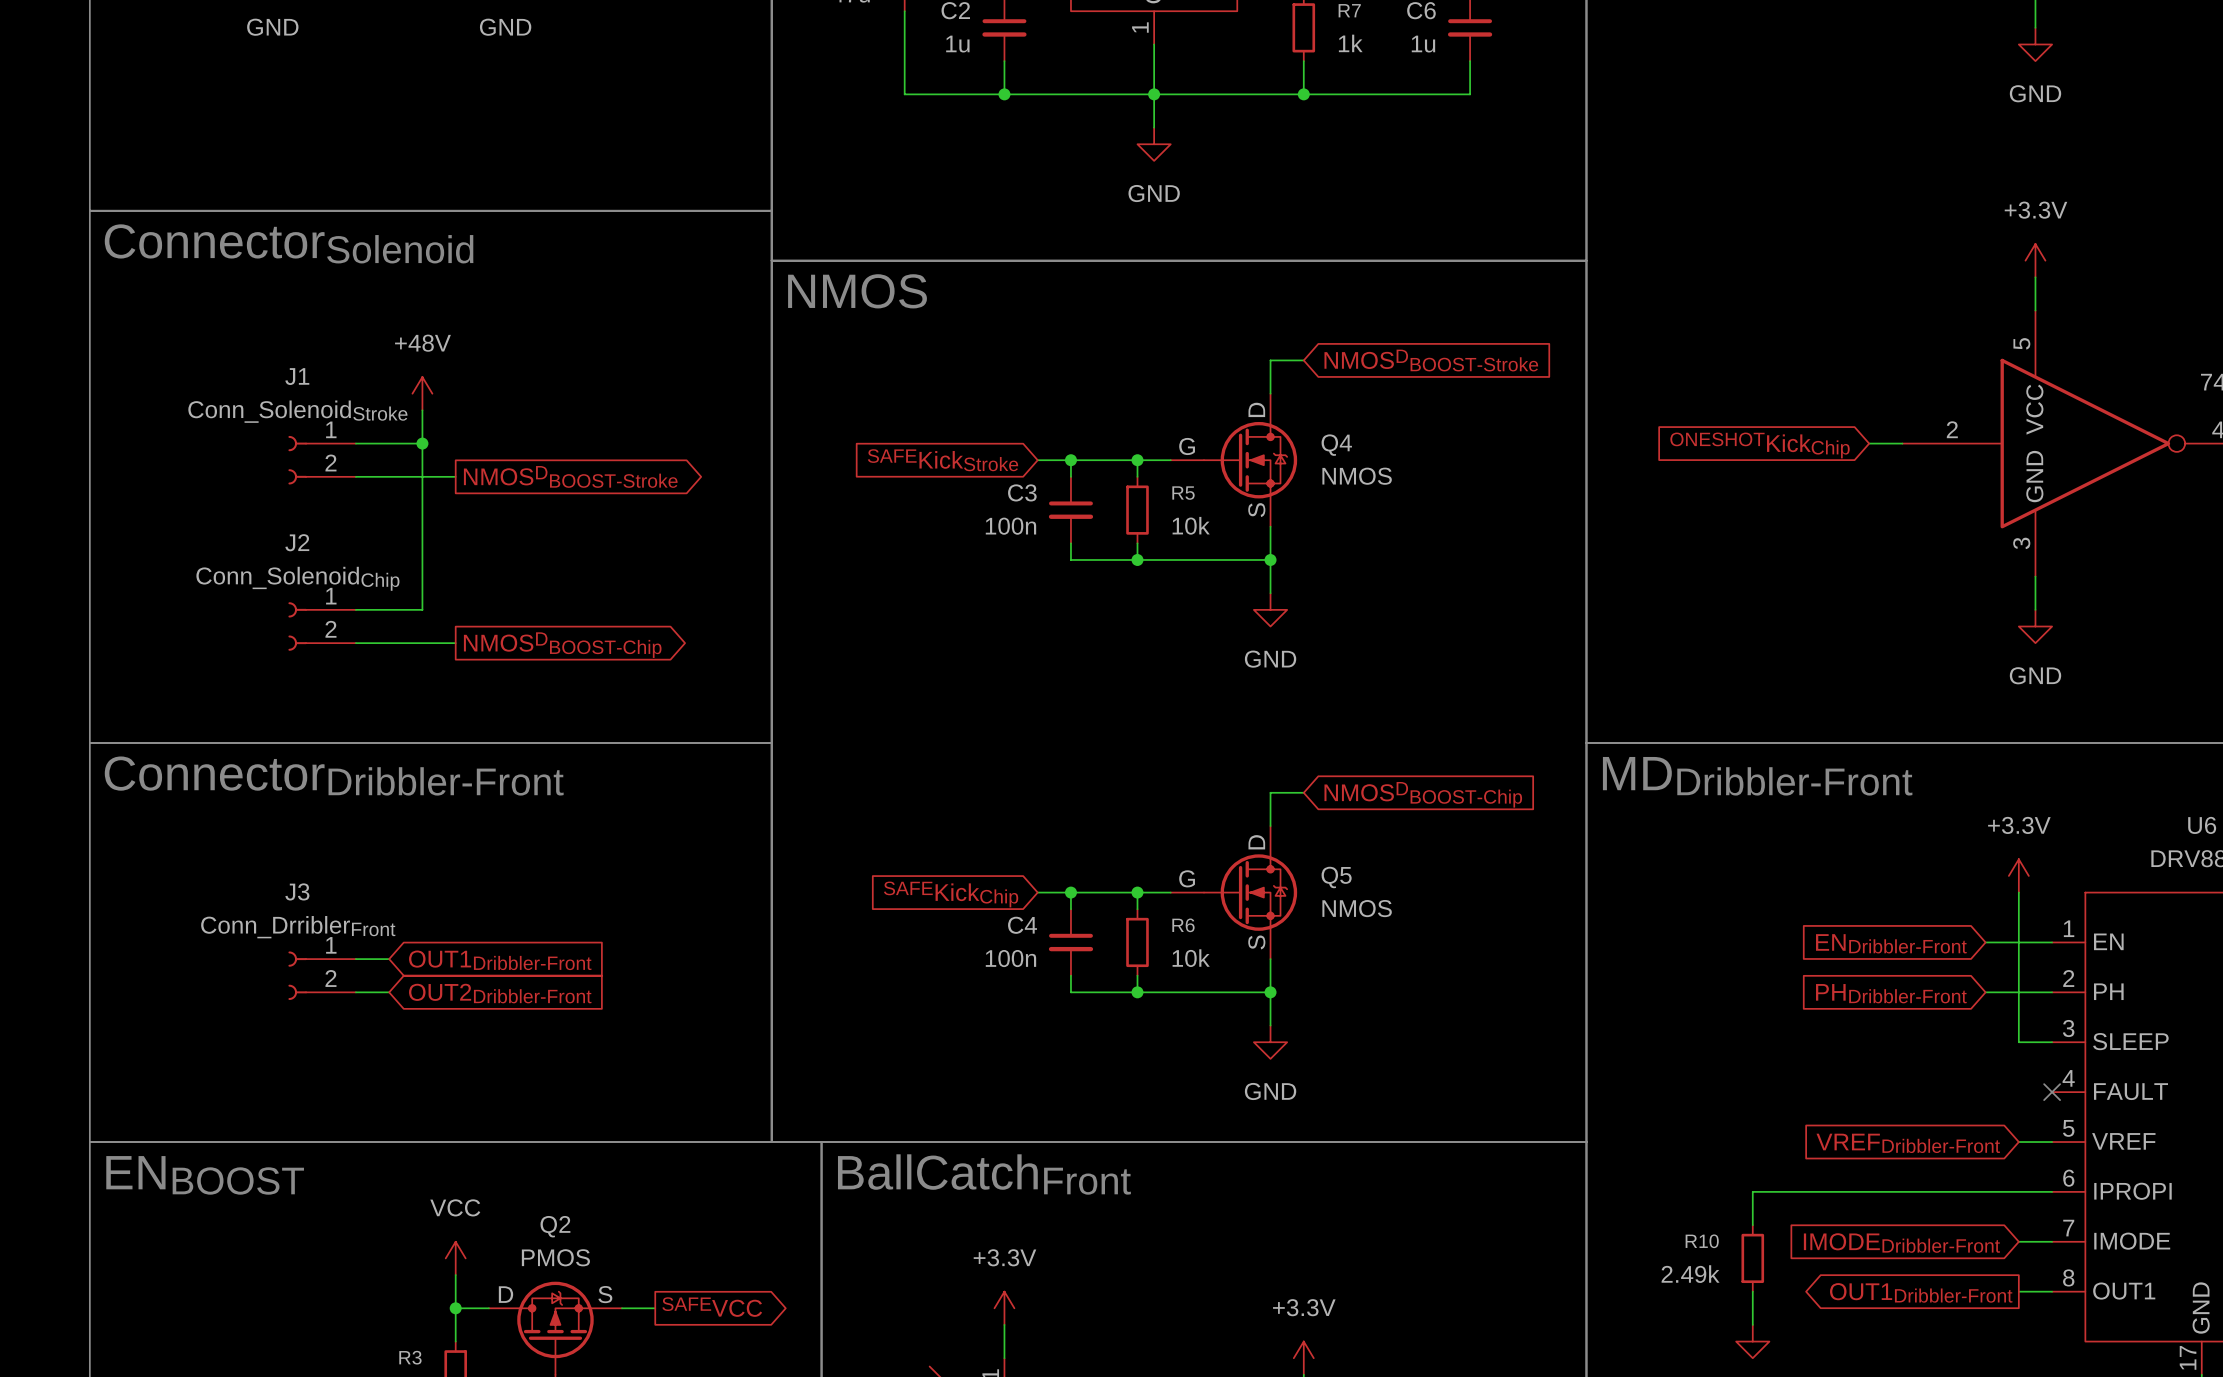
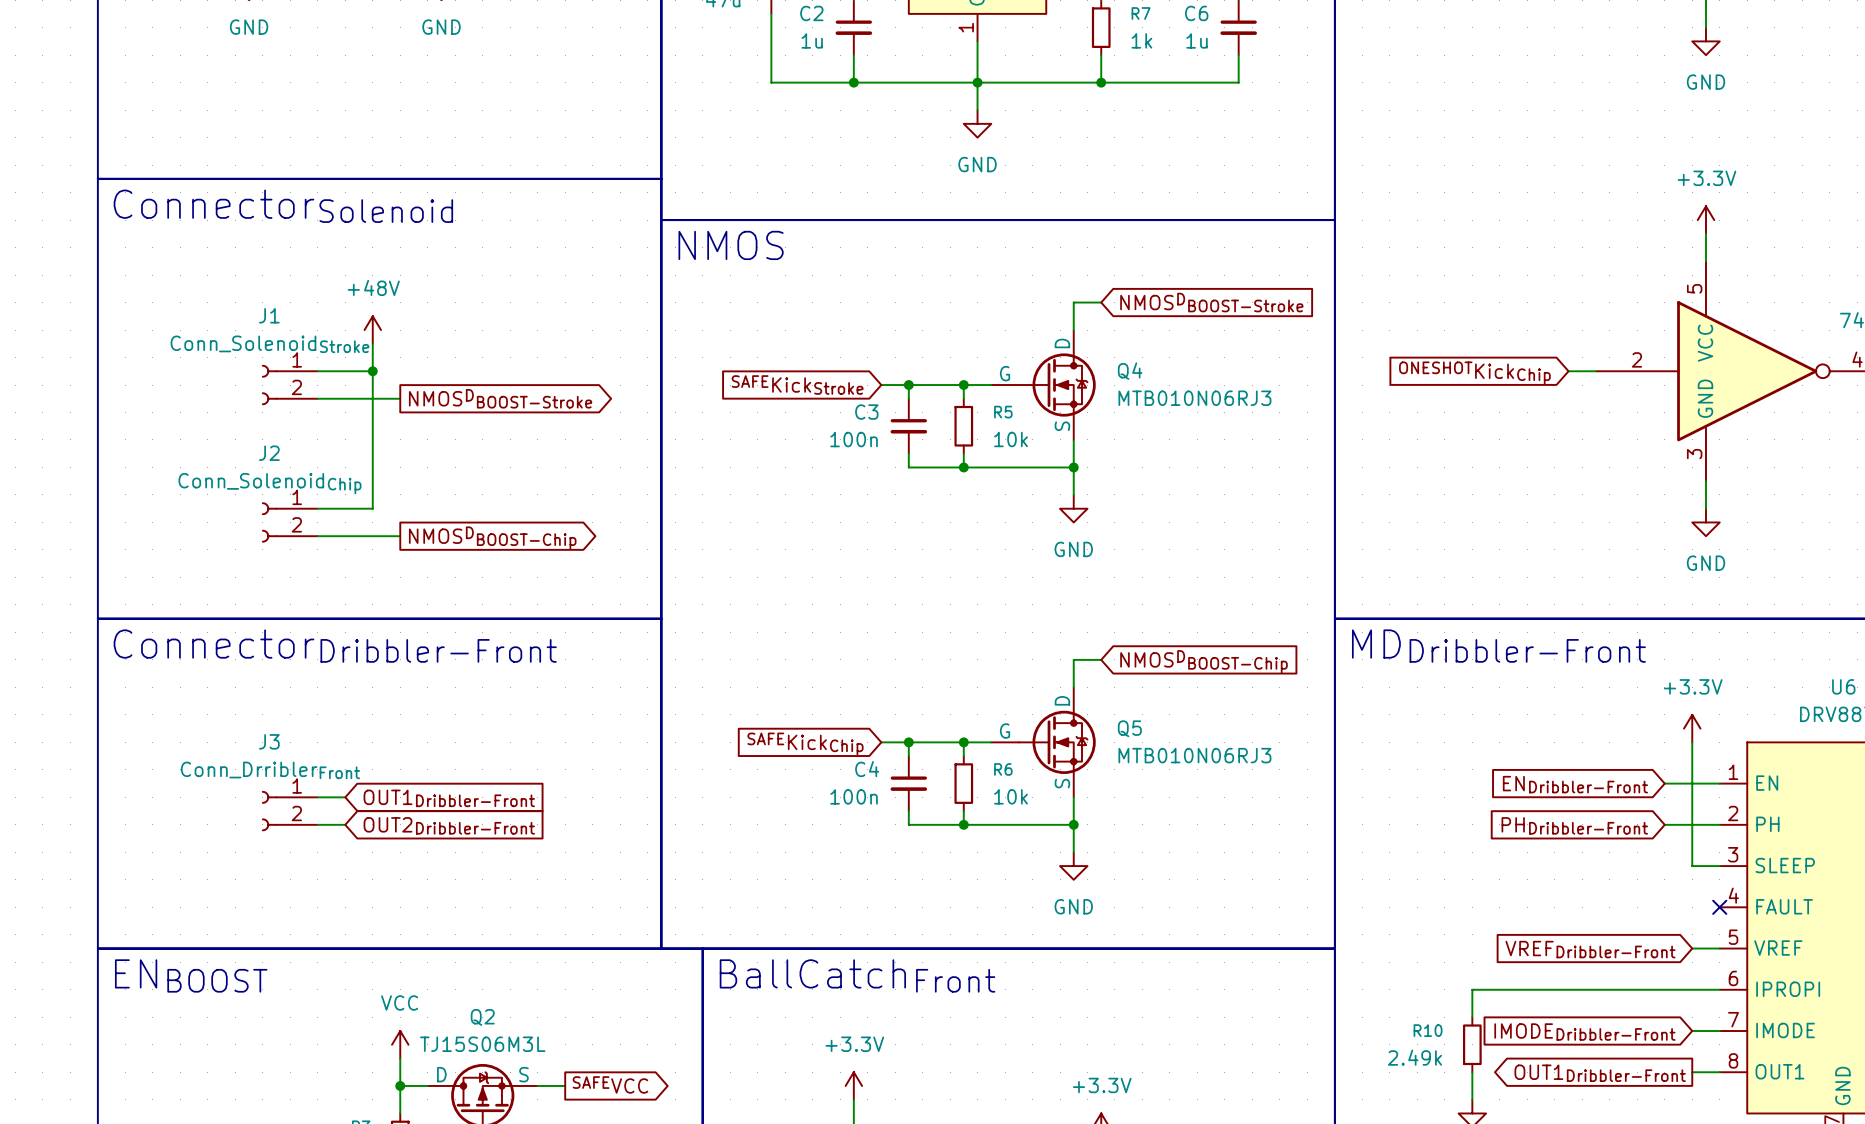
Q4 value: NMOS (1357, 476) -> MTB010N06RJ3 (1194, 398)
Q5 value: NMOS (1357, 908) -> MTB010N06RJ3 (1194, 755)
Q2 value: PMOS (555, 1257) -> TJ15S06M3L (482, 1044)

